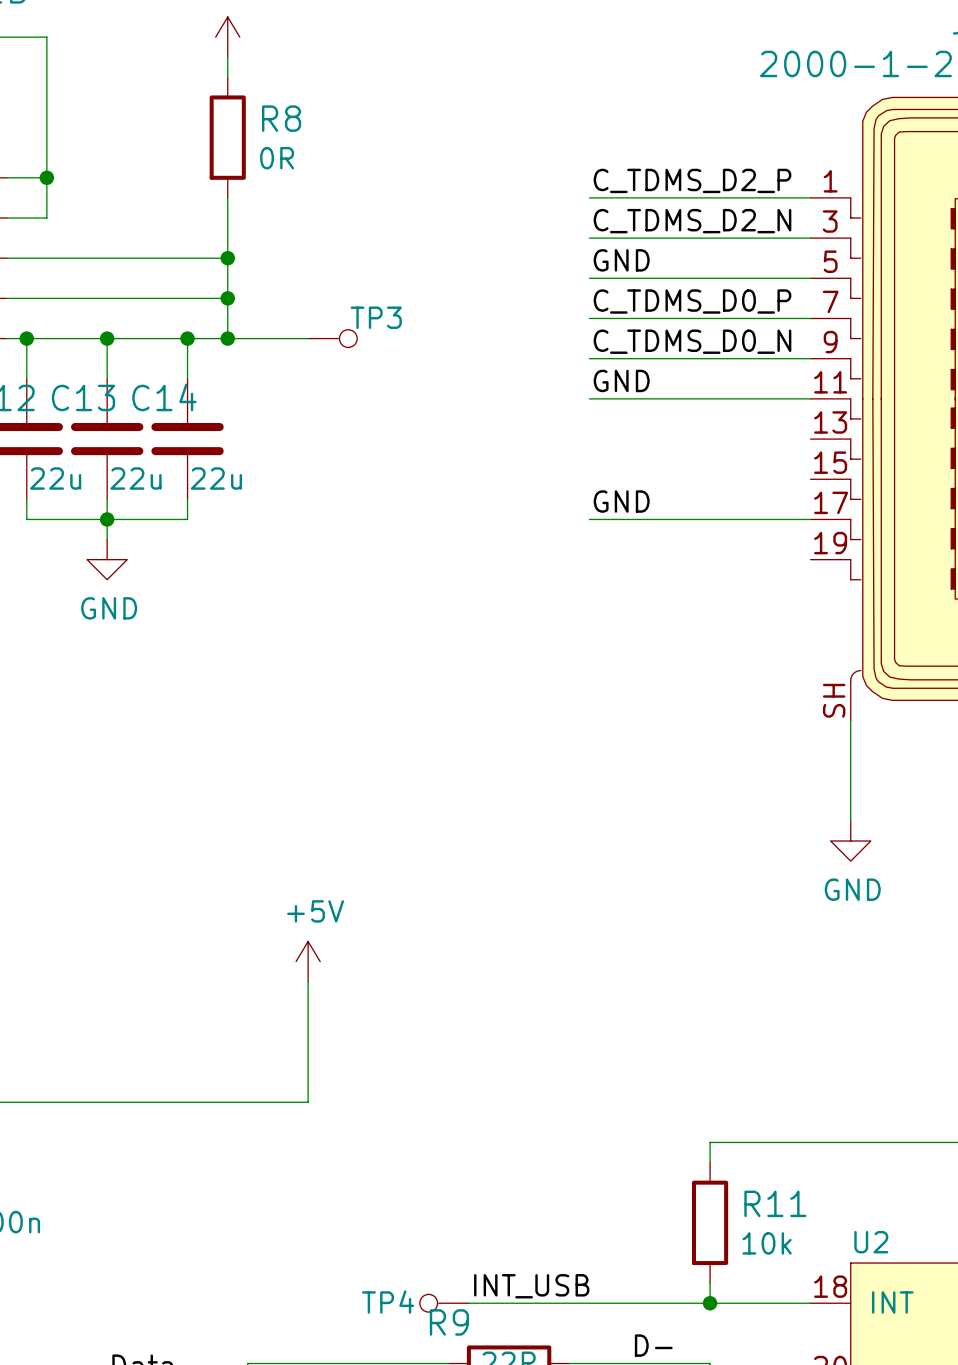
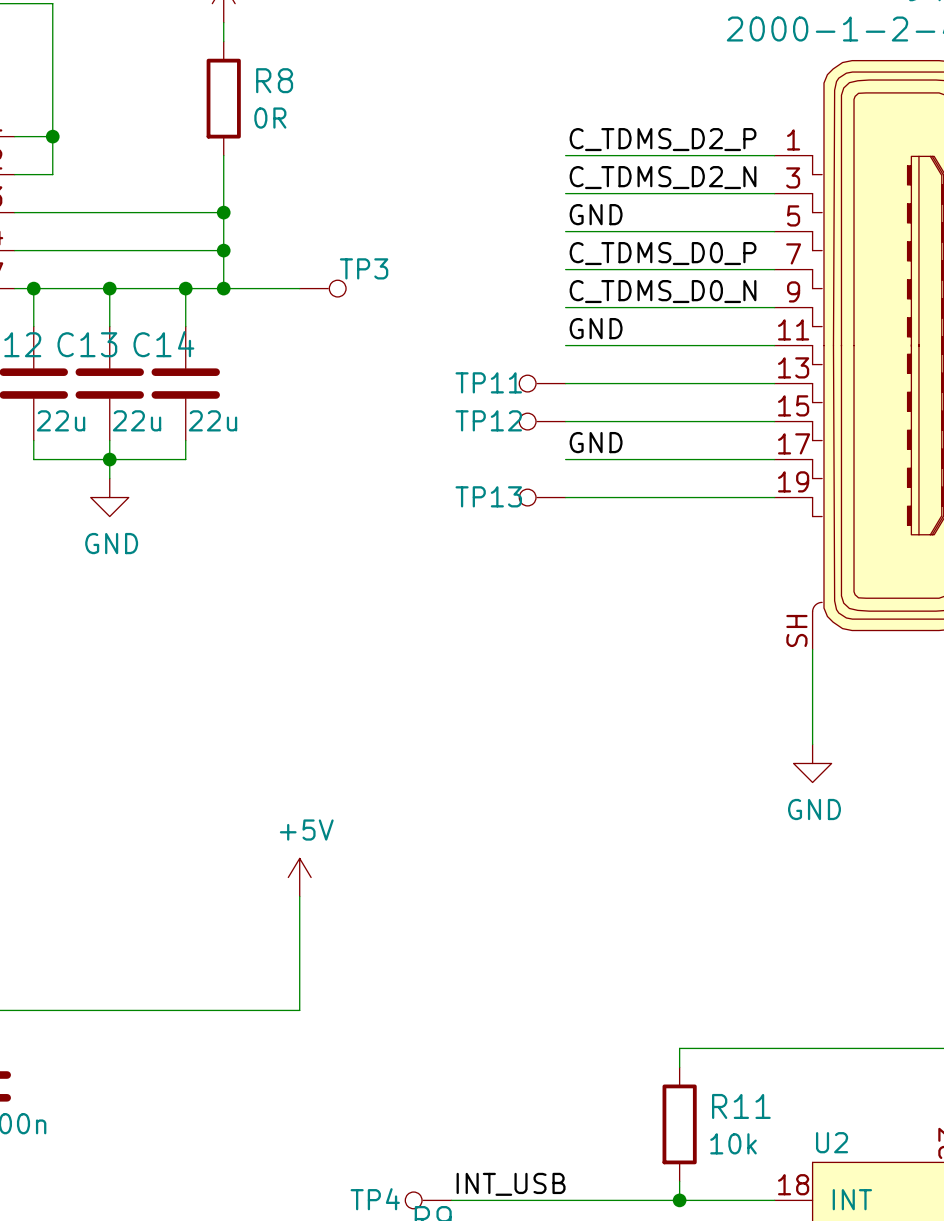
TP11: none -> (542, 383)
wire: none -> (565, 383) (774, 383)
TP12: none -> (542, 421)
wire: none -> (565, 421) (774, 421)
TP13: none -> (542, 497)
wire: none -> (565, 497) (774, 497)

